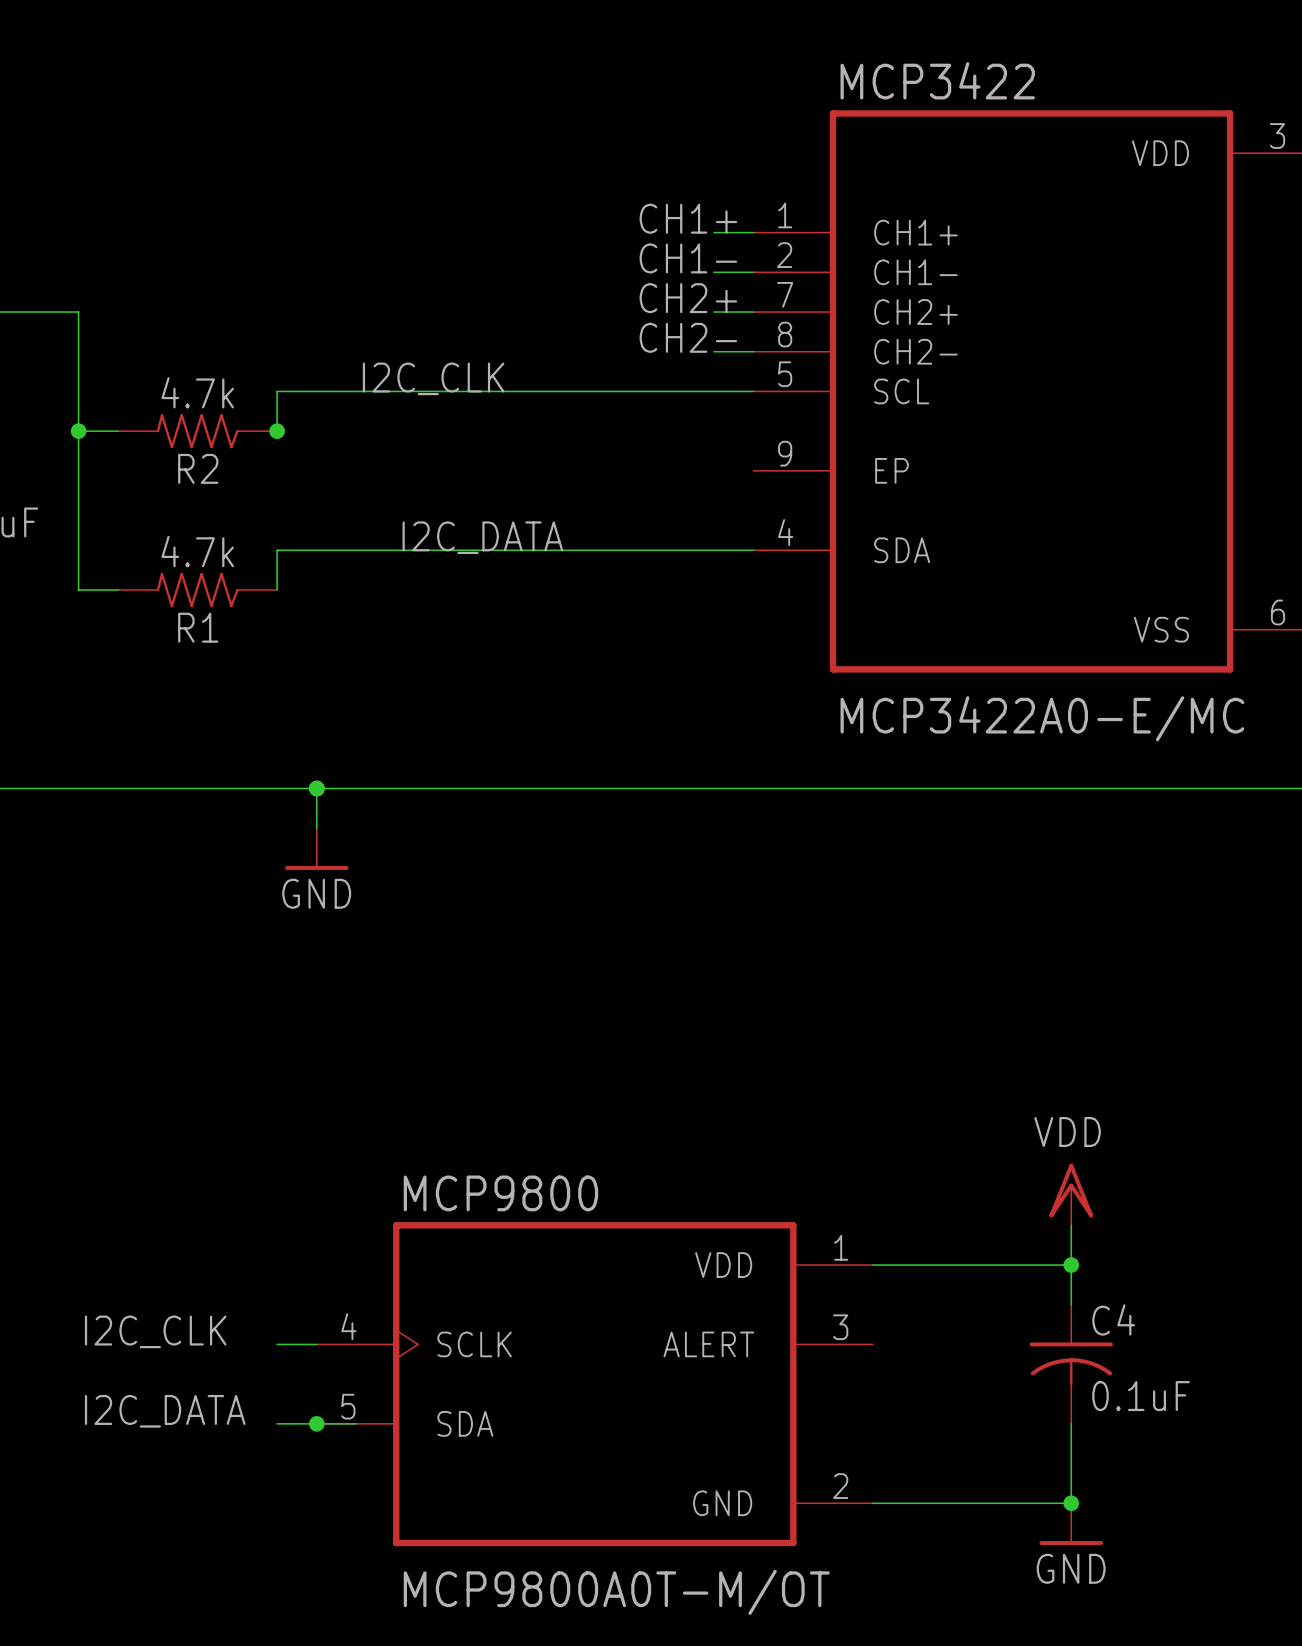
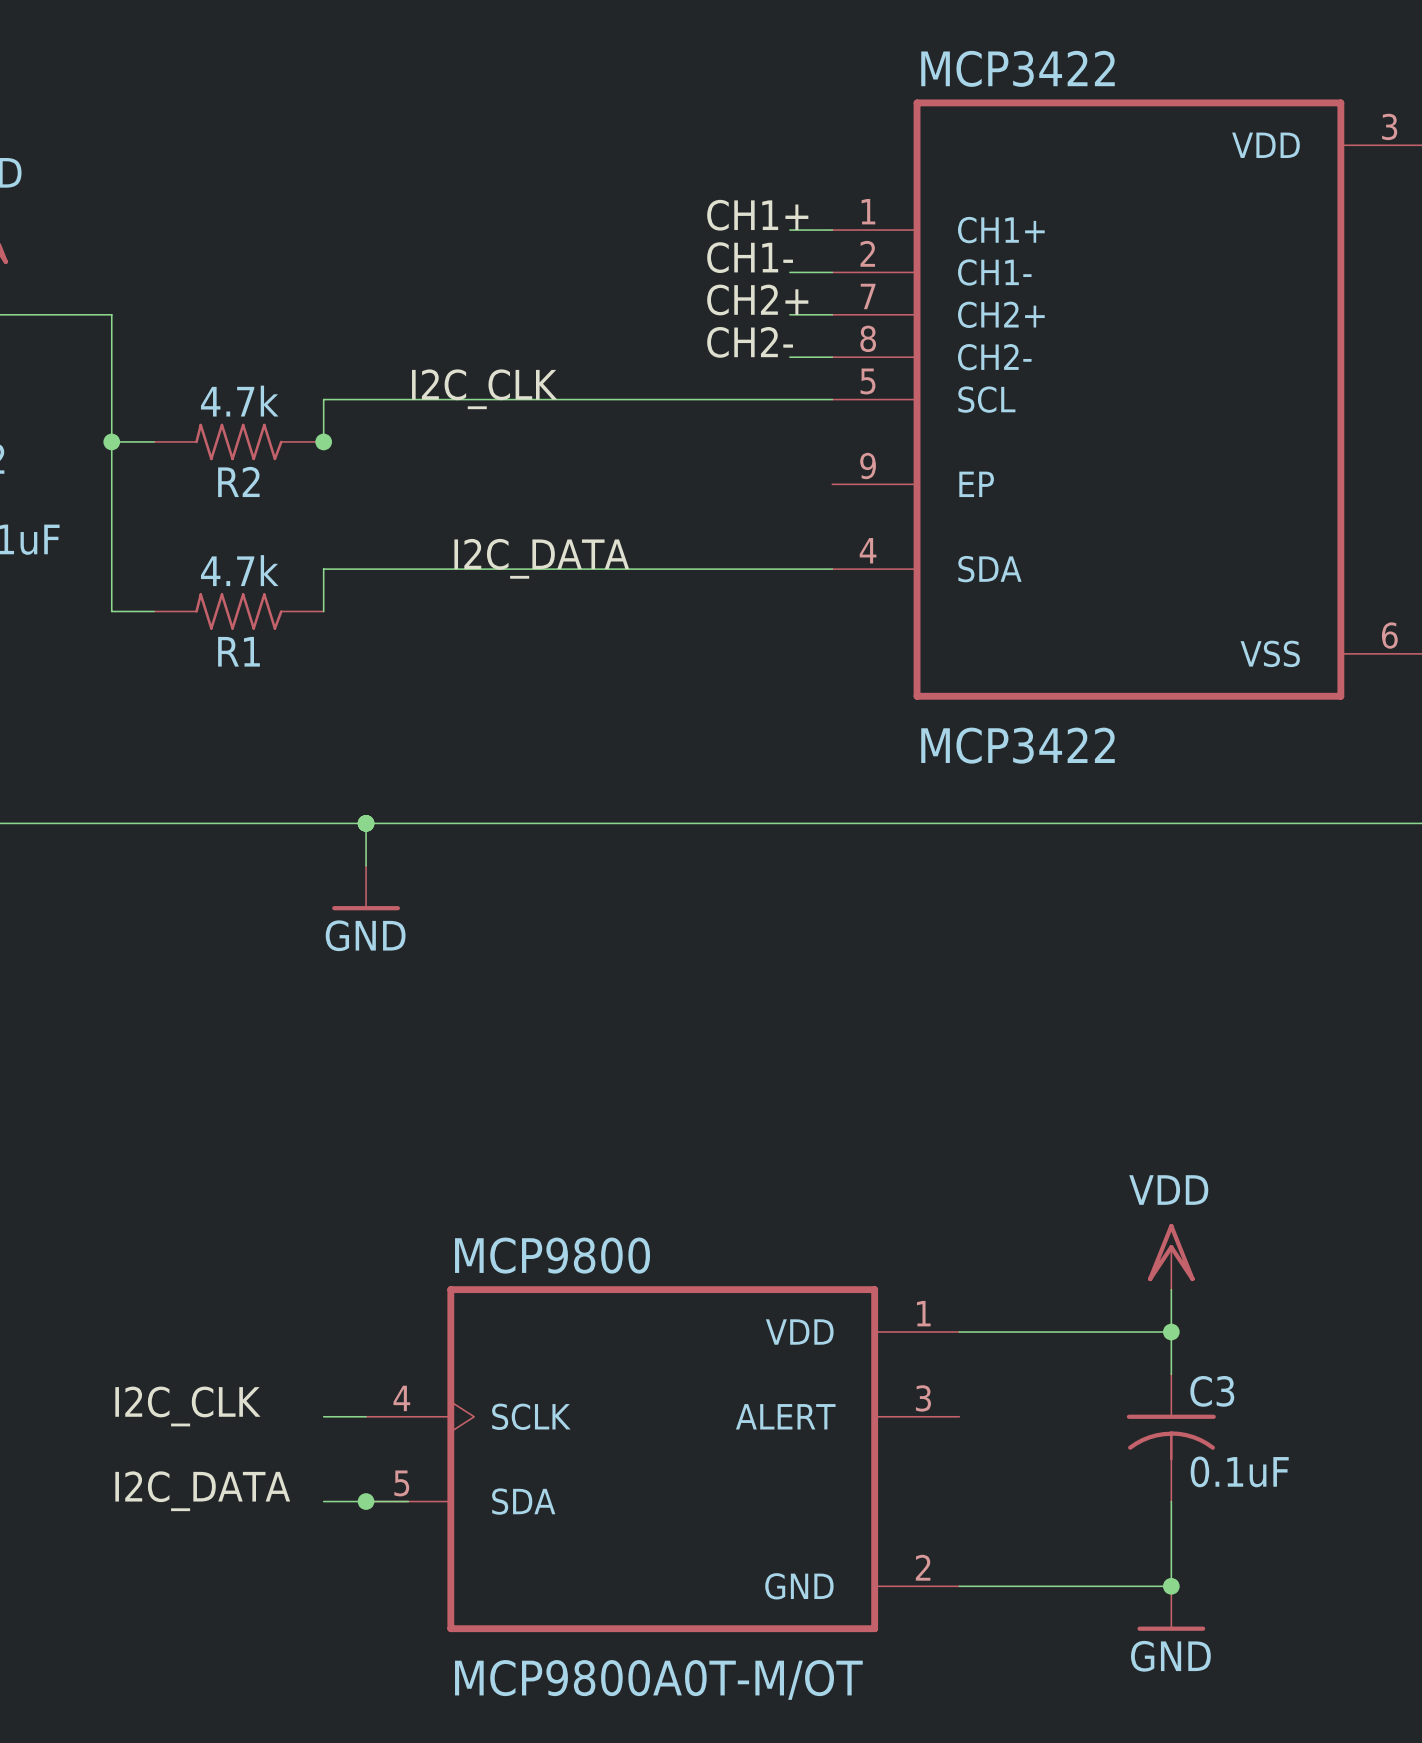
MCP3422 value: MCP3422A0-E/MC (1042, 718) -> MCP3422 (1018, 745)
C4 name: C4 (1113, 1319) -> C3 (1212, 1391)

